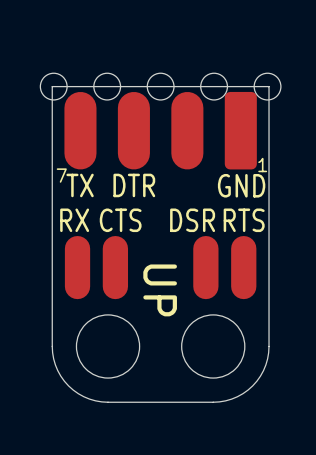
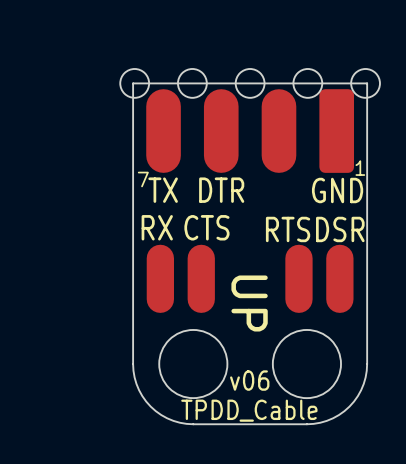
part value: DSR (192, 220) -> RTS (288, 229)
part value: RTS (244, 220) -> DSR (340, 229)
text: none -> v06 (249, 380)
text: none -> TPDD_Cable (249, 410)

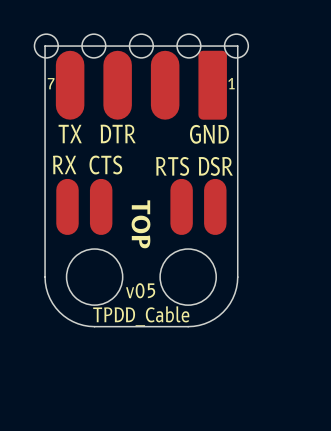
part text position: 1 (360, 168) -> 1 (231, 83)
part text position: 7 (143, 179) -> 7 (51, 83)
text: UP (249, 303) -> TOP (140, 224)
text: v06 (249, 380) -> v05 (140, 290)

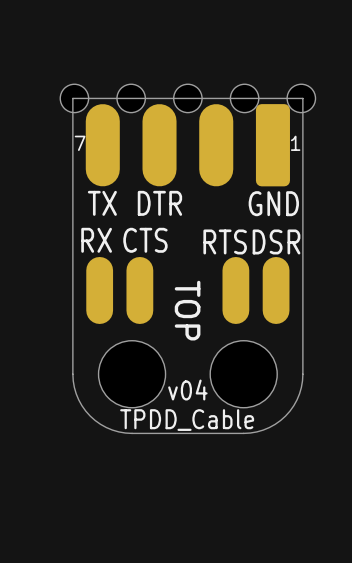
text: v05 (140, 290) -> v04 (187, 390)

